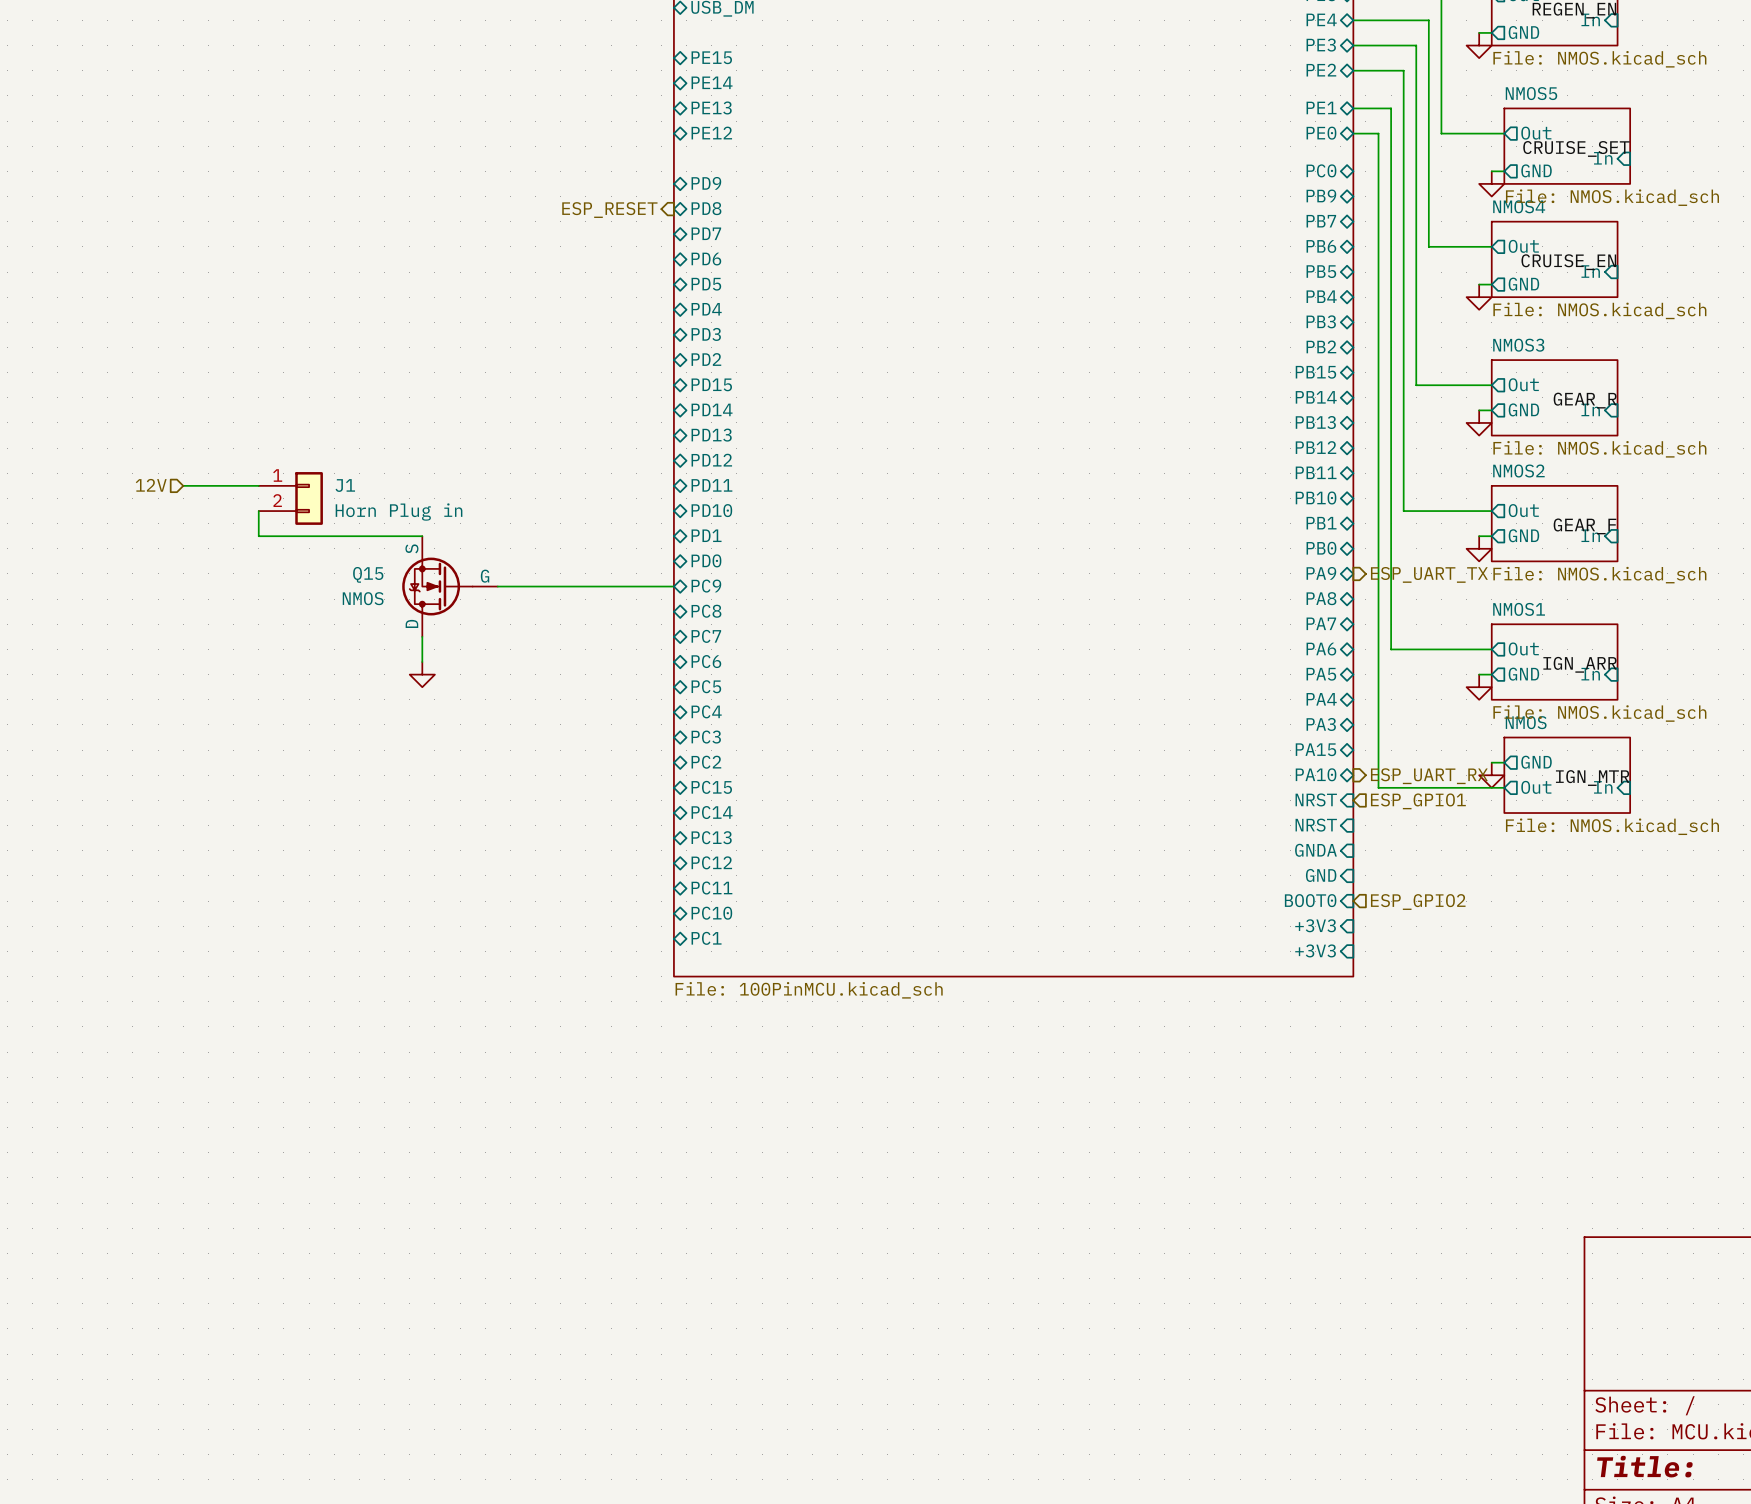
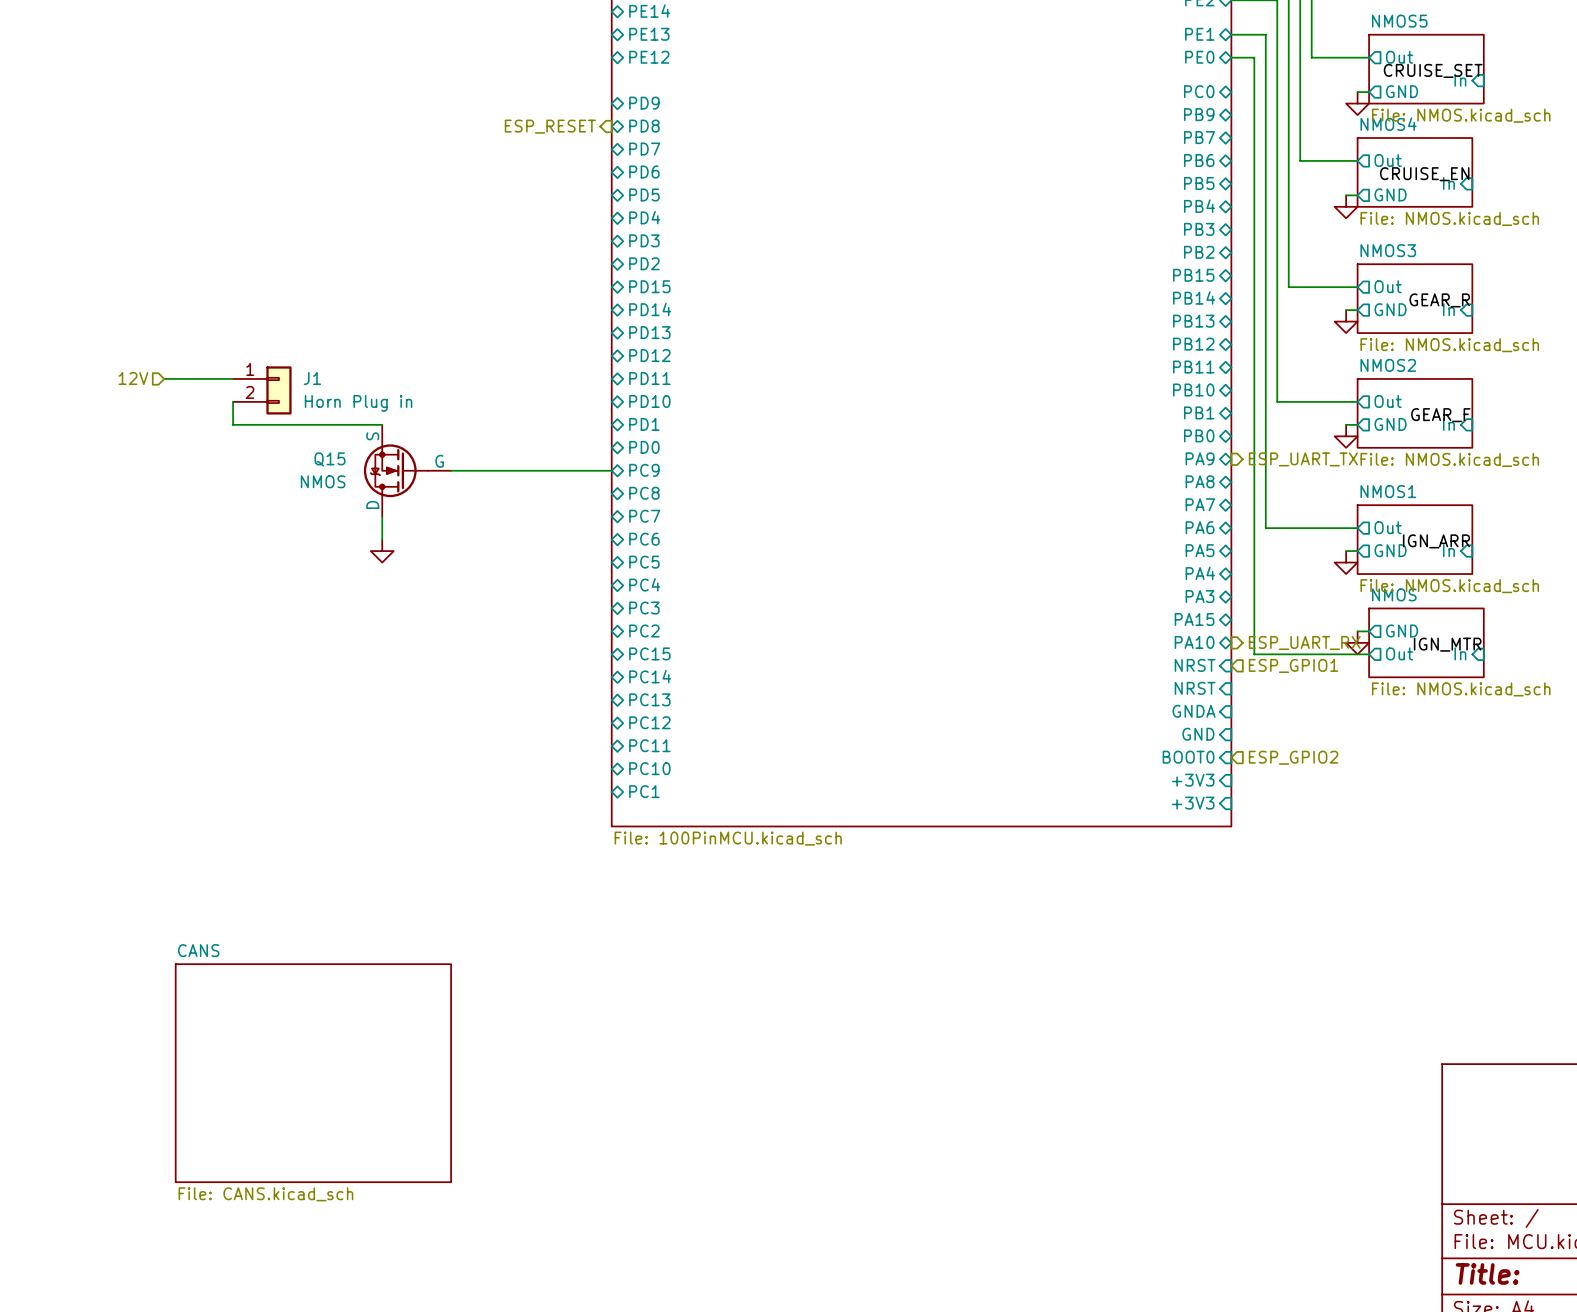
sheet CANS: none -> File: CANS.kicad_sch (313, 1073)

